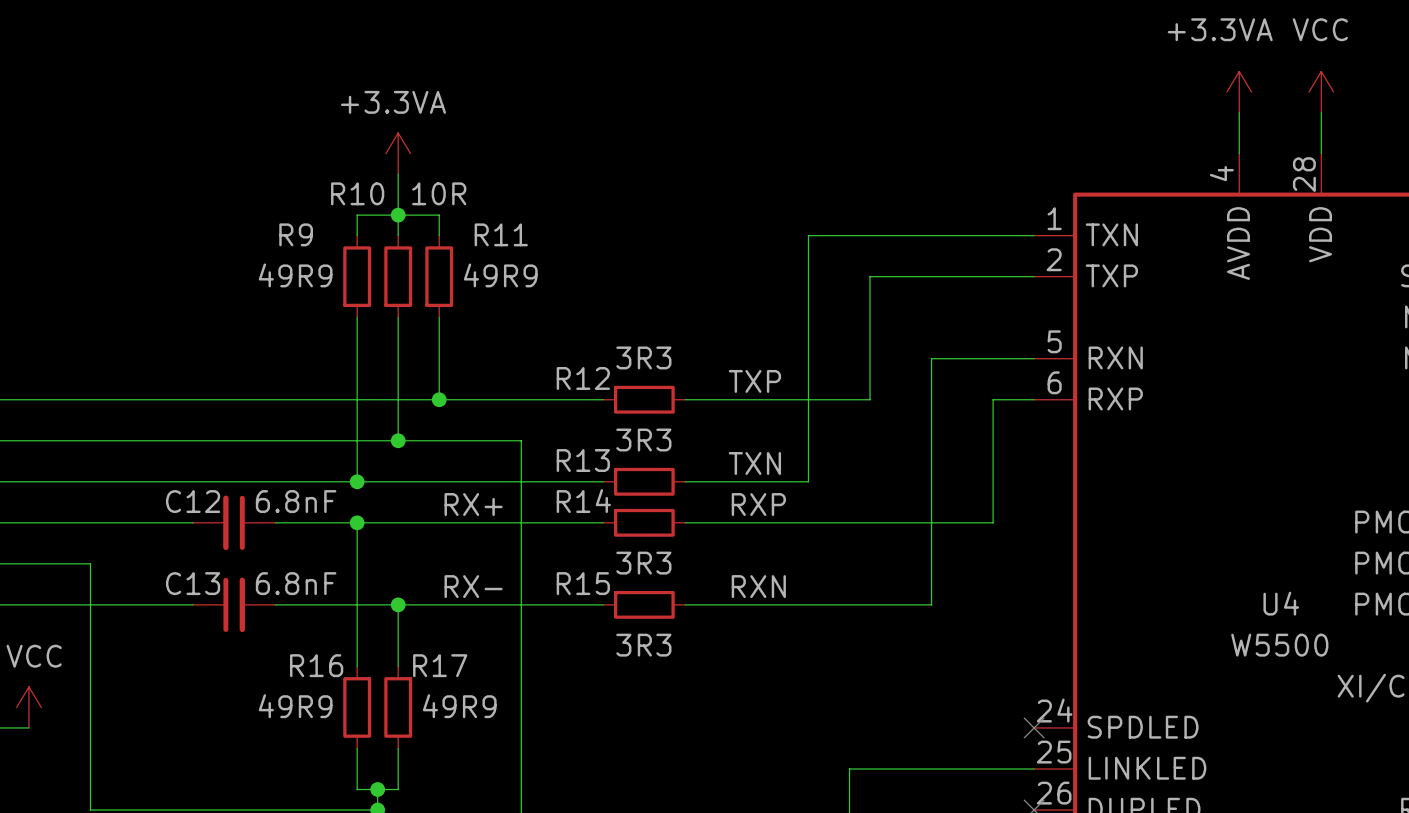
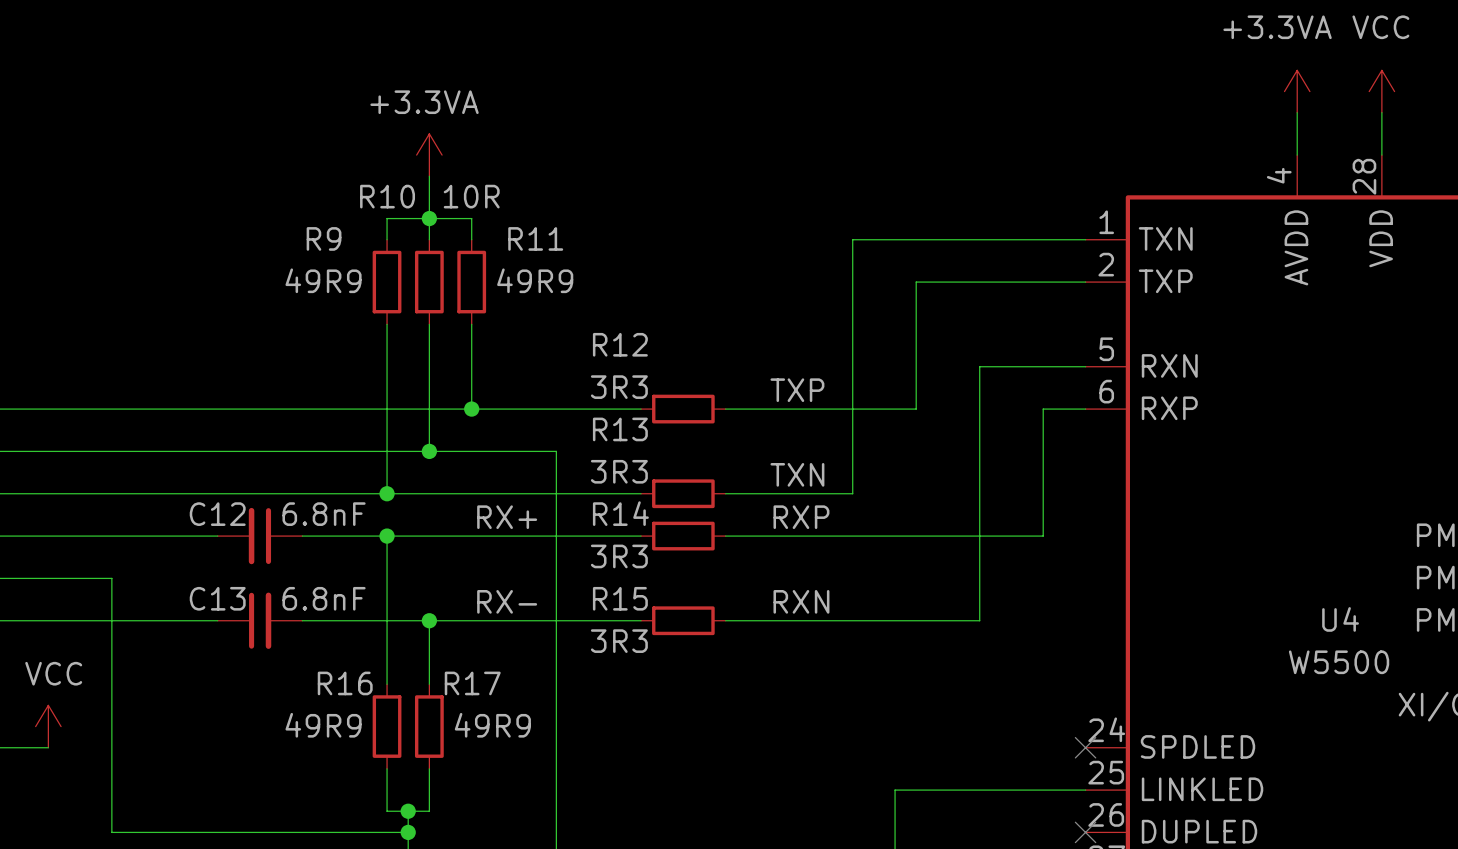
R12 value position: 3R3 (643, 357) -> 3R3 (619, 387)
R12 name position: R12 (583, 378) -> R12 (620, 344)
R13 value position: 3R3 (643, 440) -> 3R3 (619, 471)
R13 name position: R13 (583, 460) -> R13 (620, 429)
R14 value position: 3R3 (643, 563) -> 3R3 (619, 556)
R15 value position: 3R3 (643, 645) -> 3R3 (619, 641)

